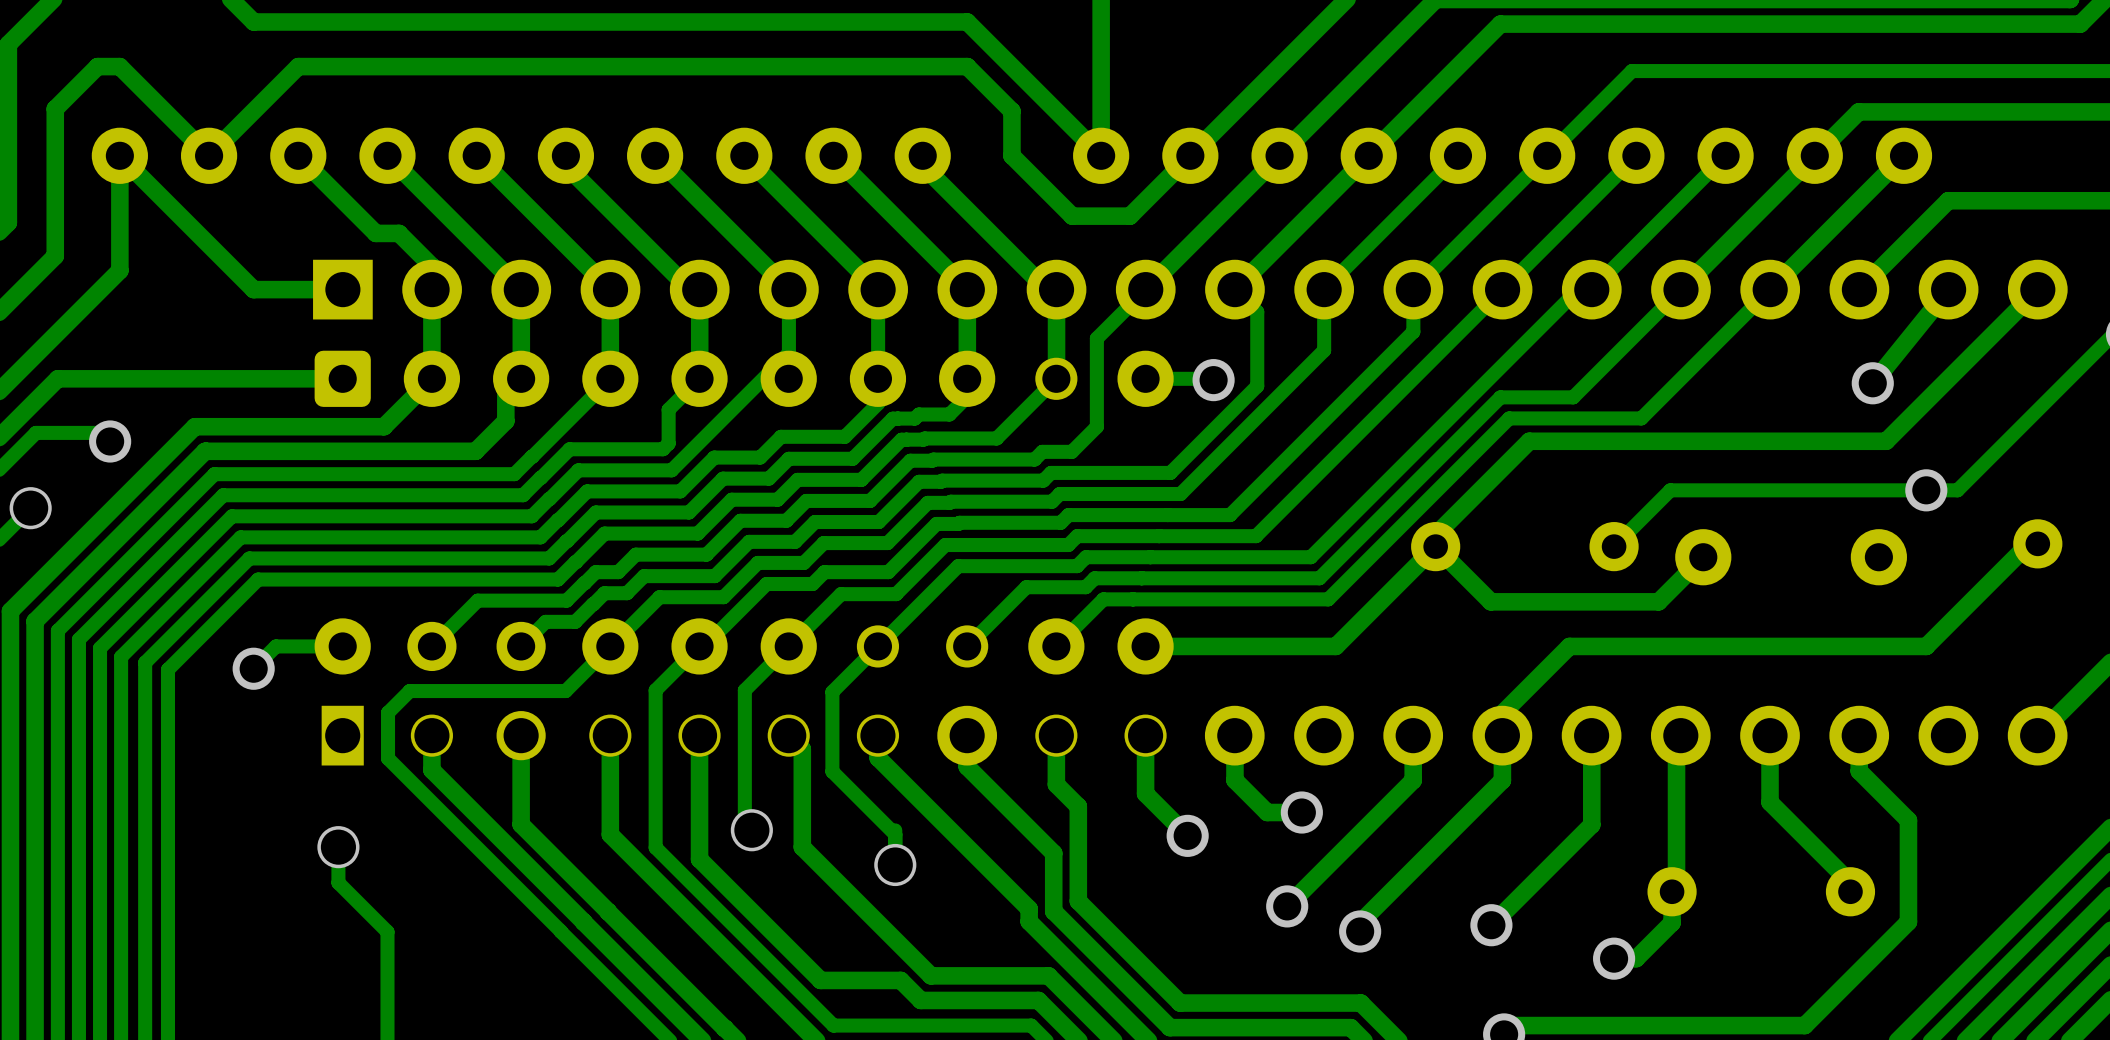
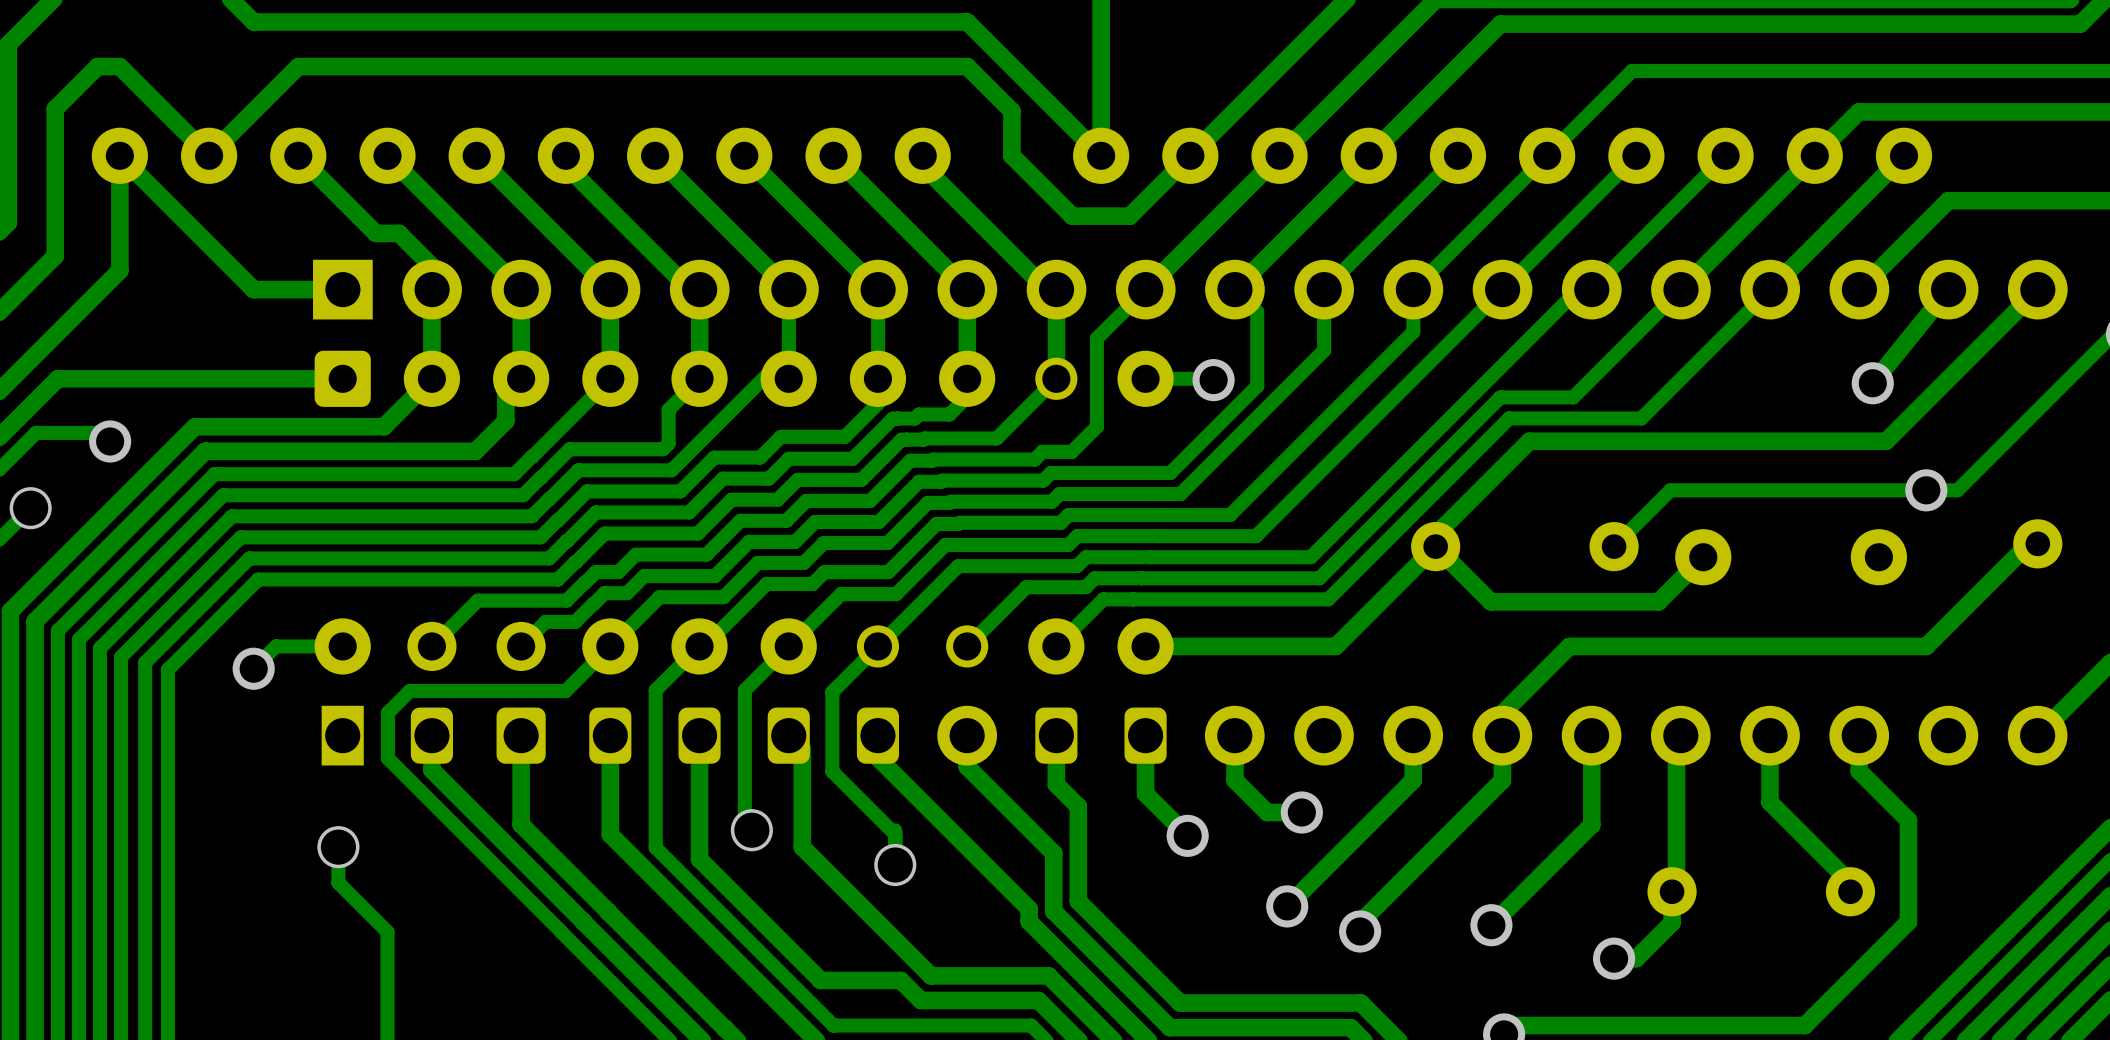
part footprint: [321, 705, 2068, 766] -> [321, 705, 2068, 766]

